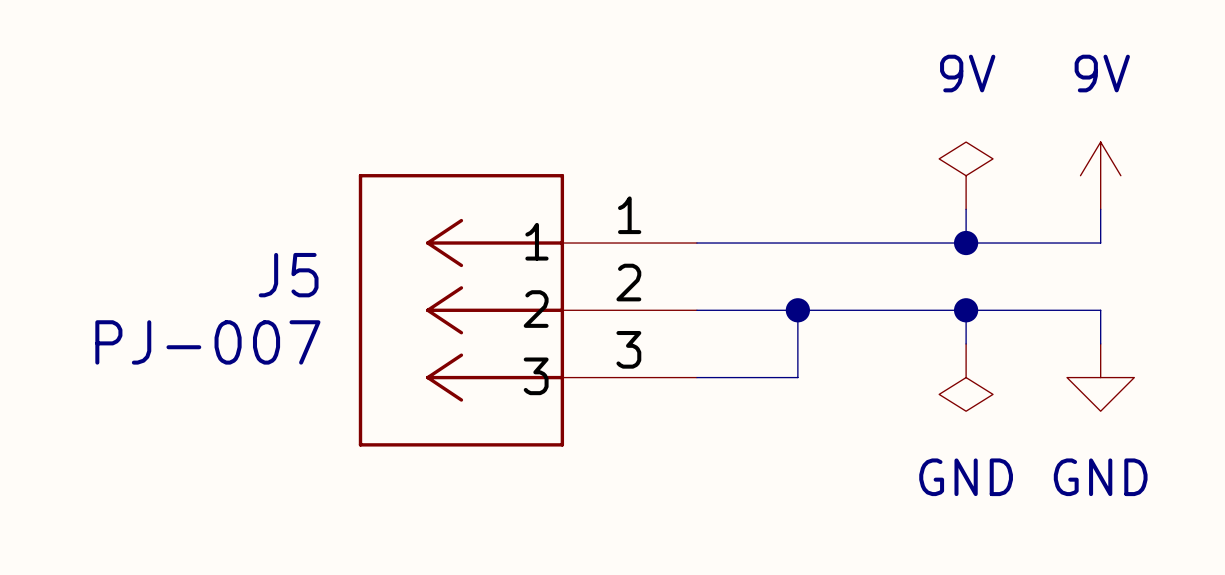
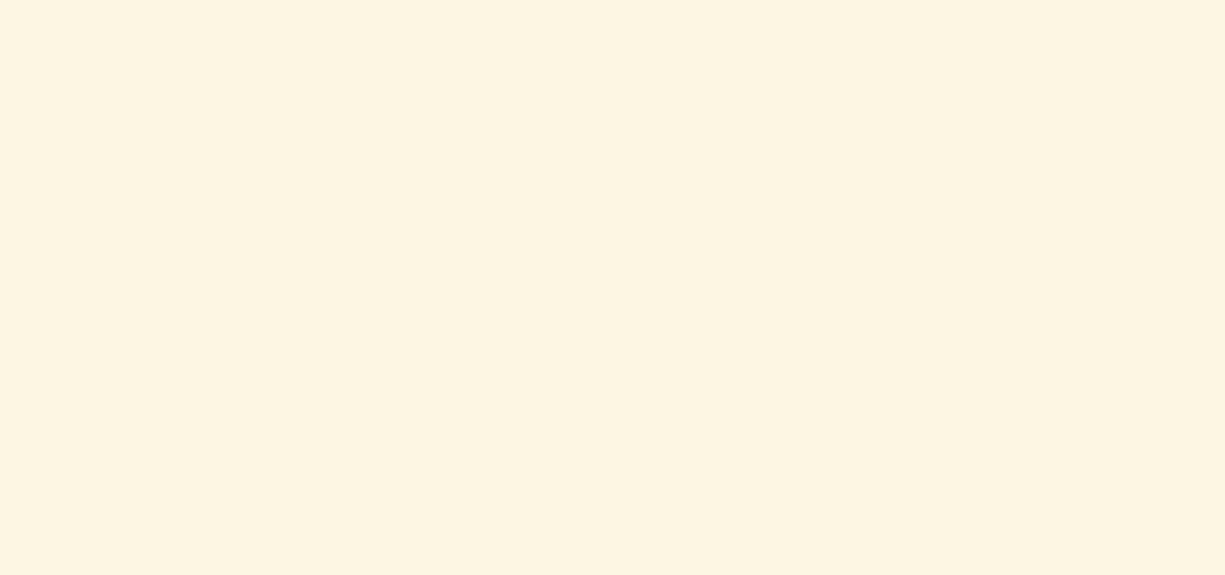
power symbol: 9V (966, 175) -> none
power symbol: 9V (1100, 175) -> none
wire: (966, 209) (966, 243) -> none
wire: (1100, 209) (1100, 243) (696, 243) -> none
junction: (966, 243) -> none
J5: PJ-007 (527, 310) -> none
wire: (696, 310) (1100, 310) (1100, 343) -> none
wire: (797, 310) (797, 377) (696, 377) -> none
junction: (797, 310) -> none
wire: (966, 310) (966, 343) -> none
junction: (966, 310) -> none
power symbol: GND (966, 377) -> none
power symbol: GND (1100, 377) -> none

